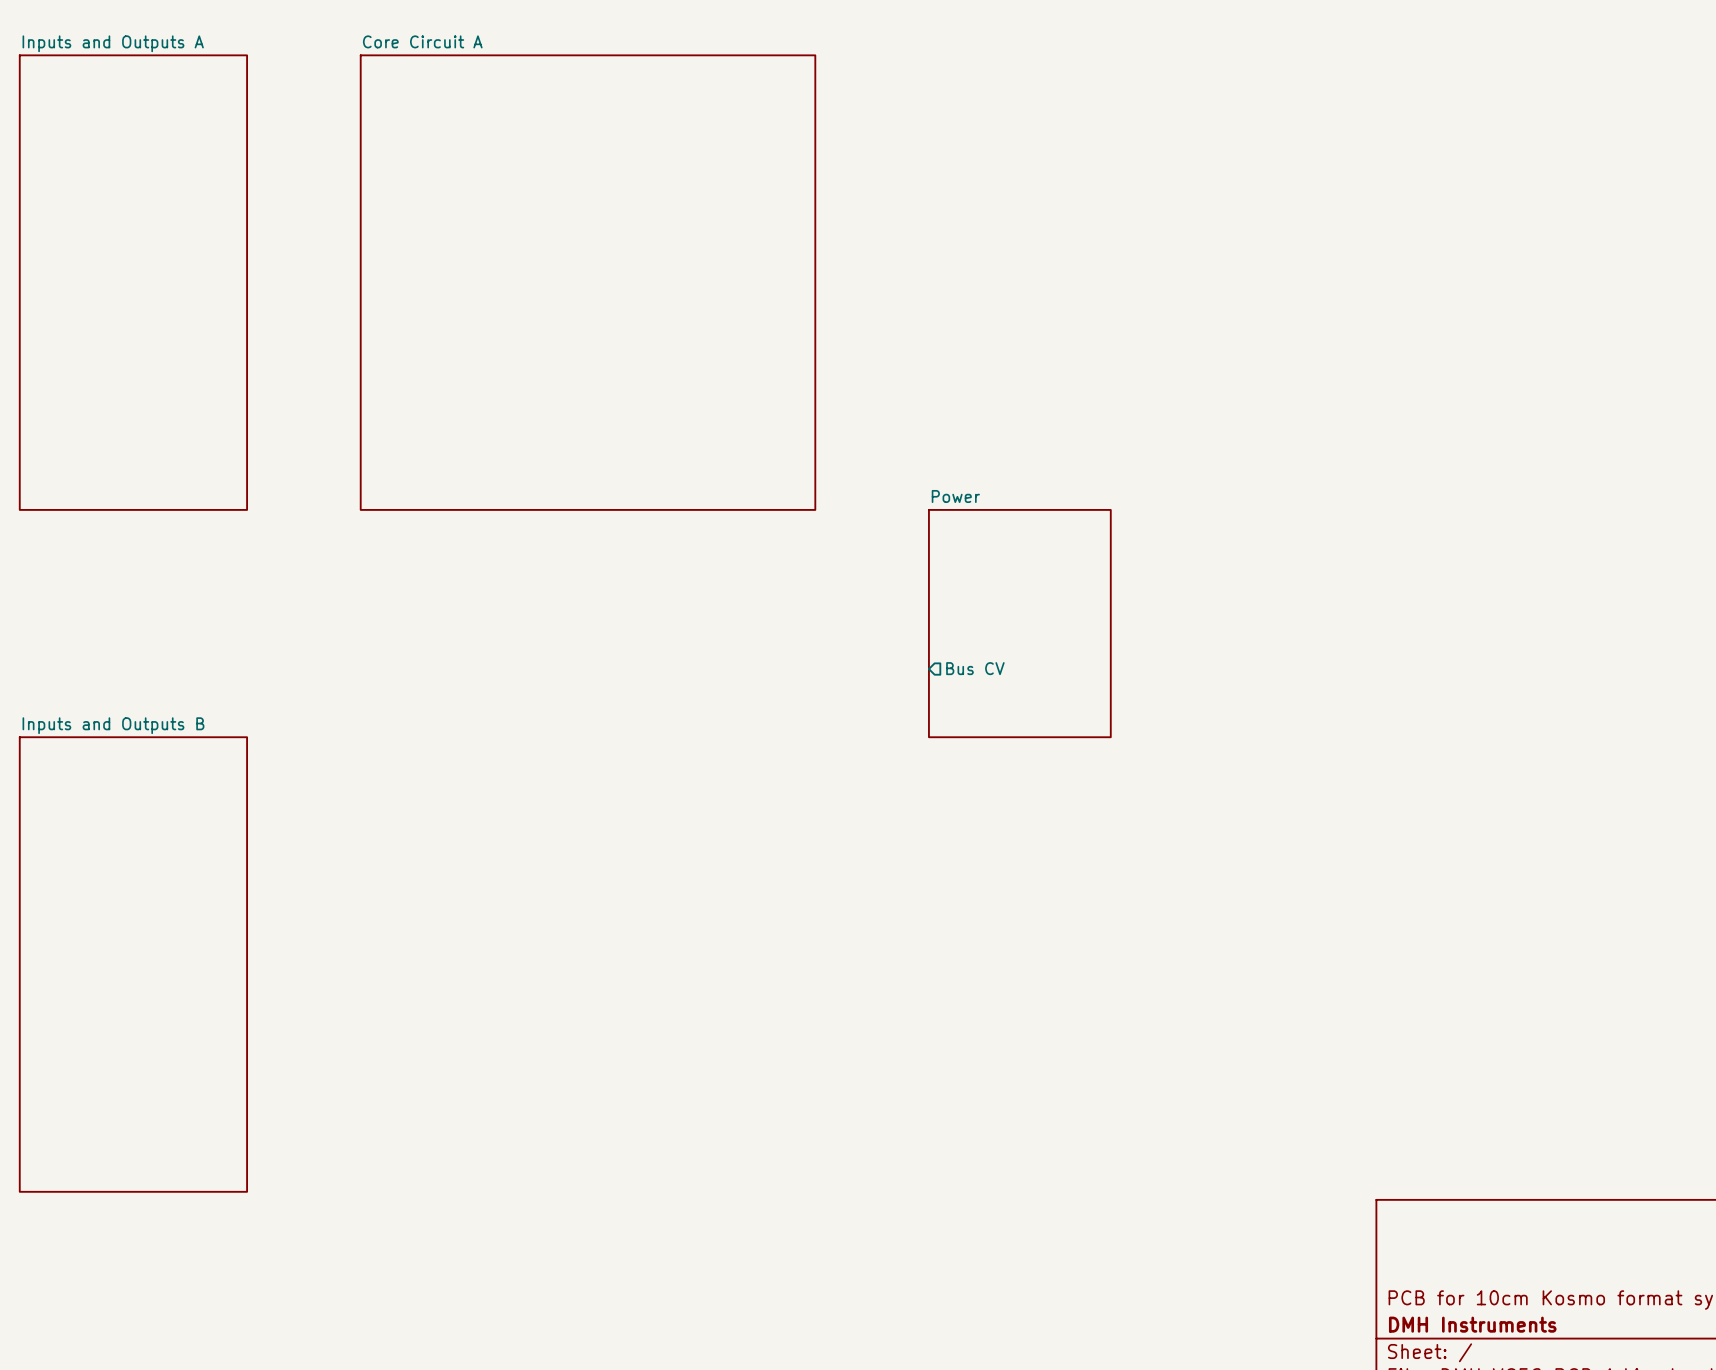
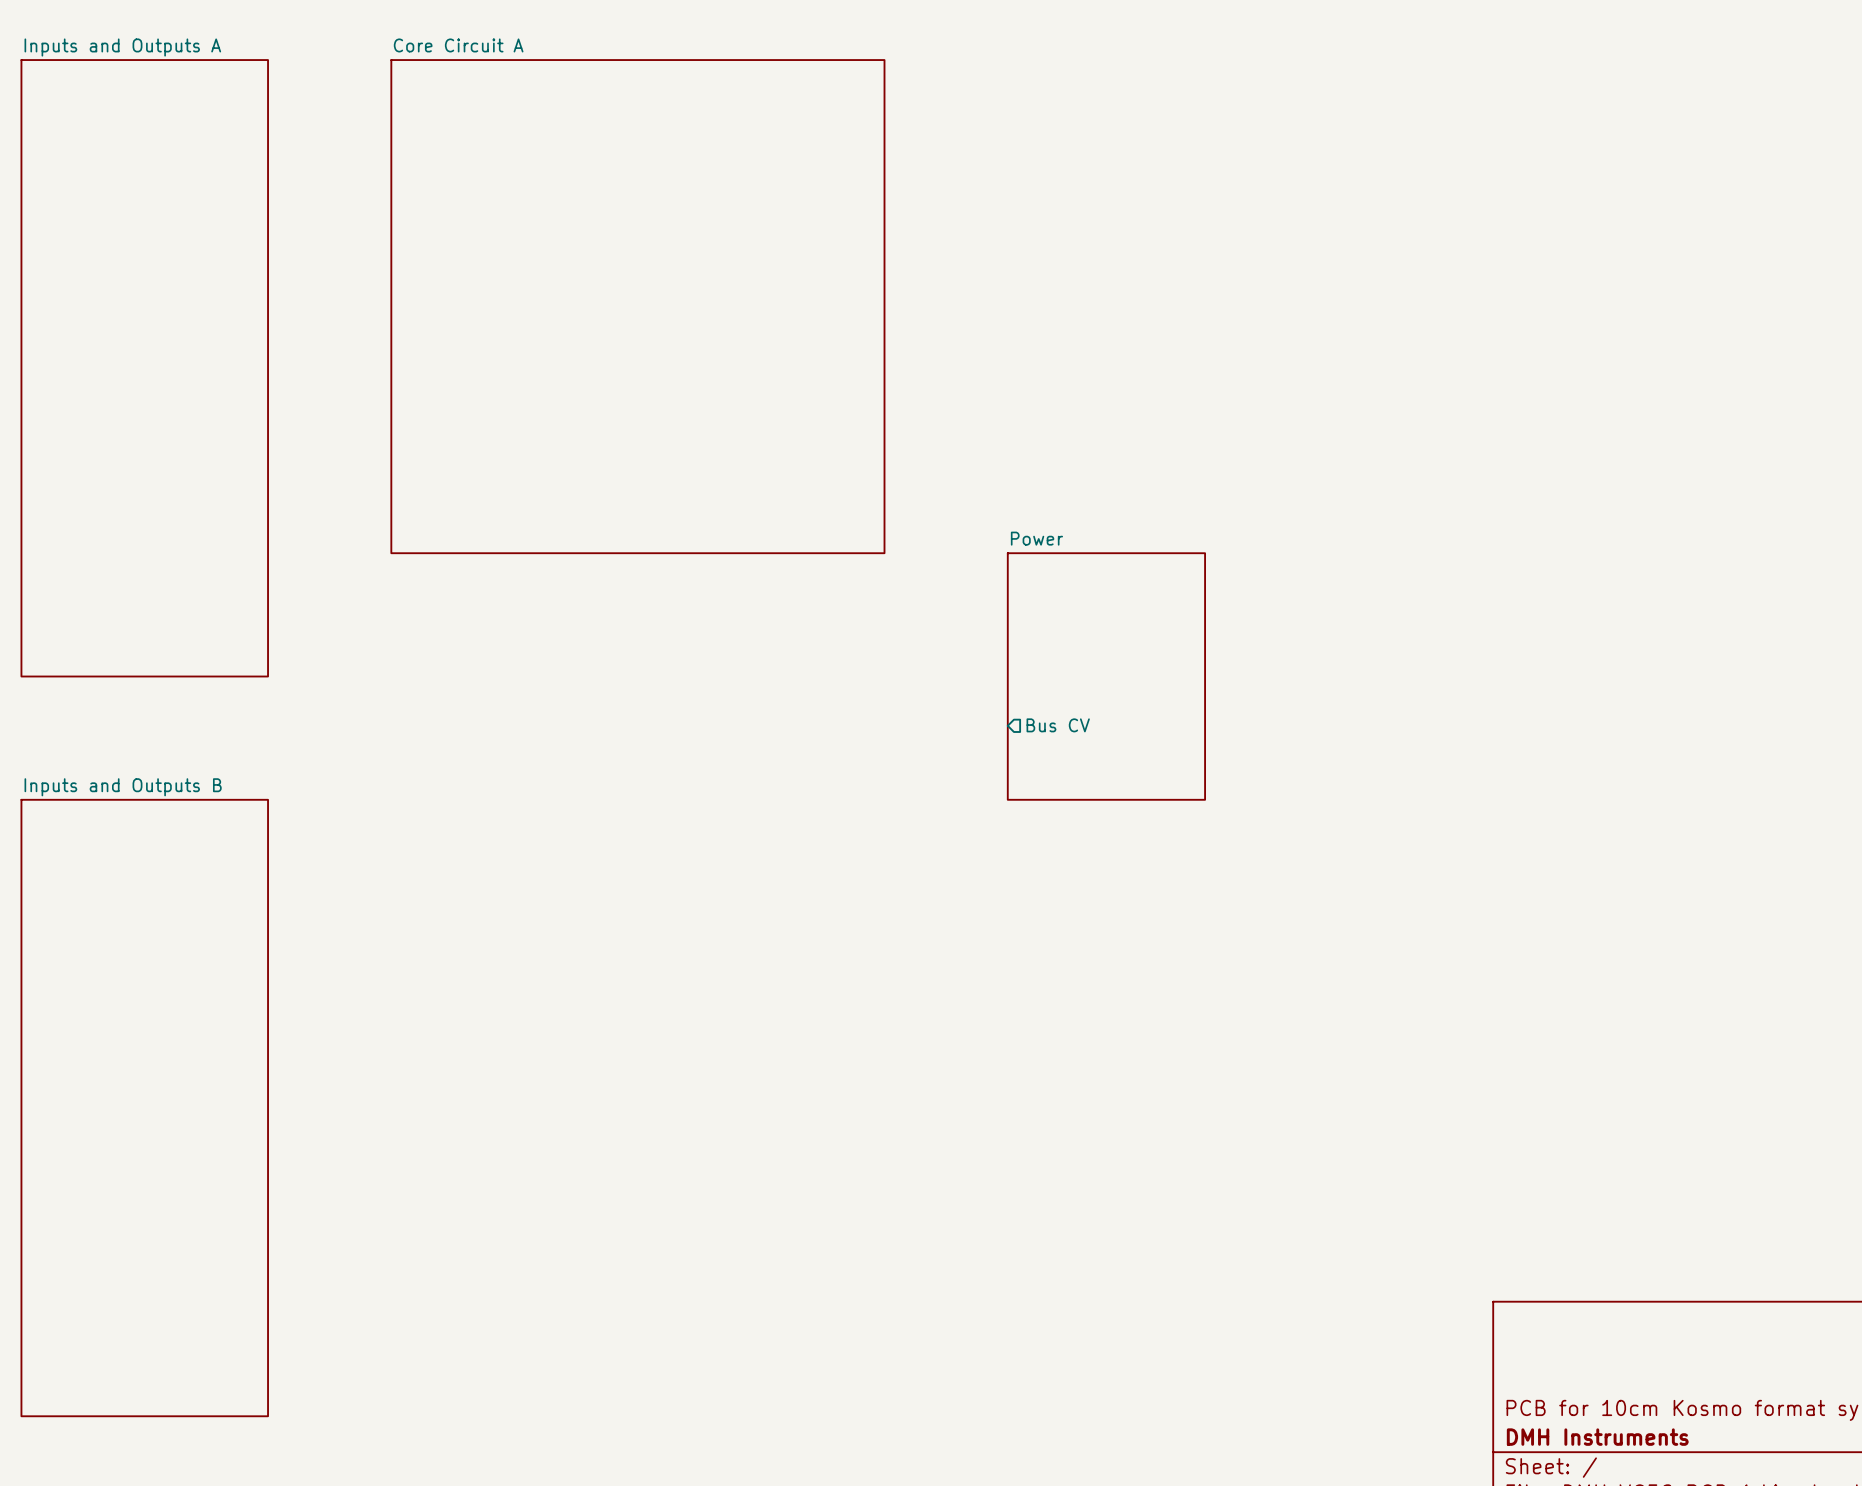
sheet Inputs and Outputs A: (133, 282) -> none
sheet Inputs and Outputs A: none -> (144, 368)
sheet Inputs and Outputs B: (133, 964) -> none
sheet Inputs and Outputs B: none -> (144, 1108)

